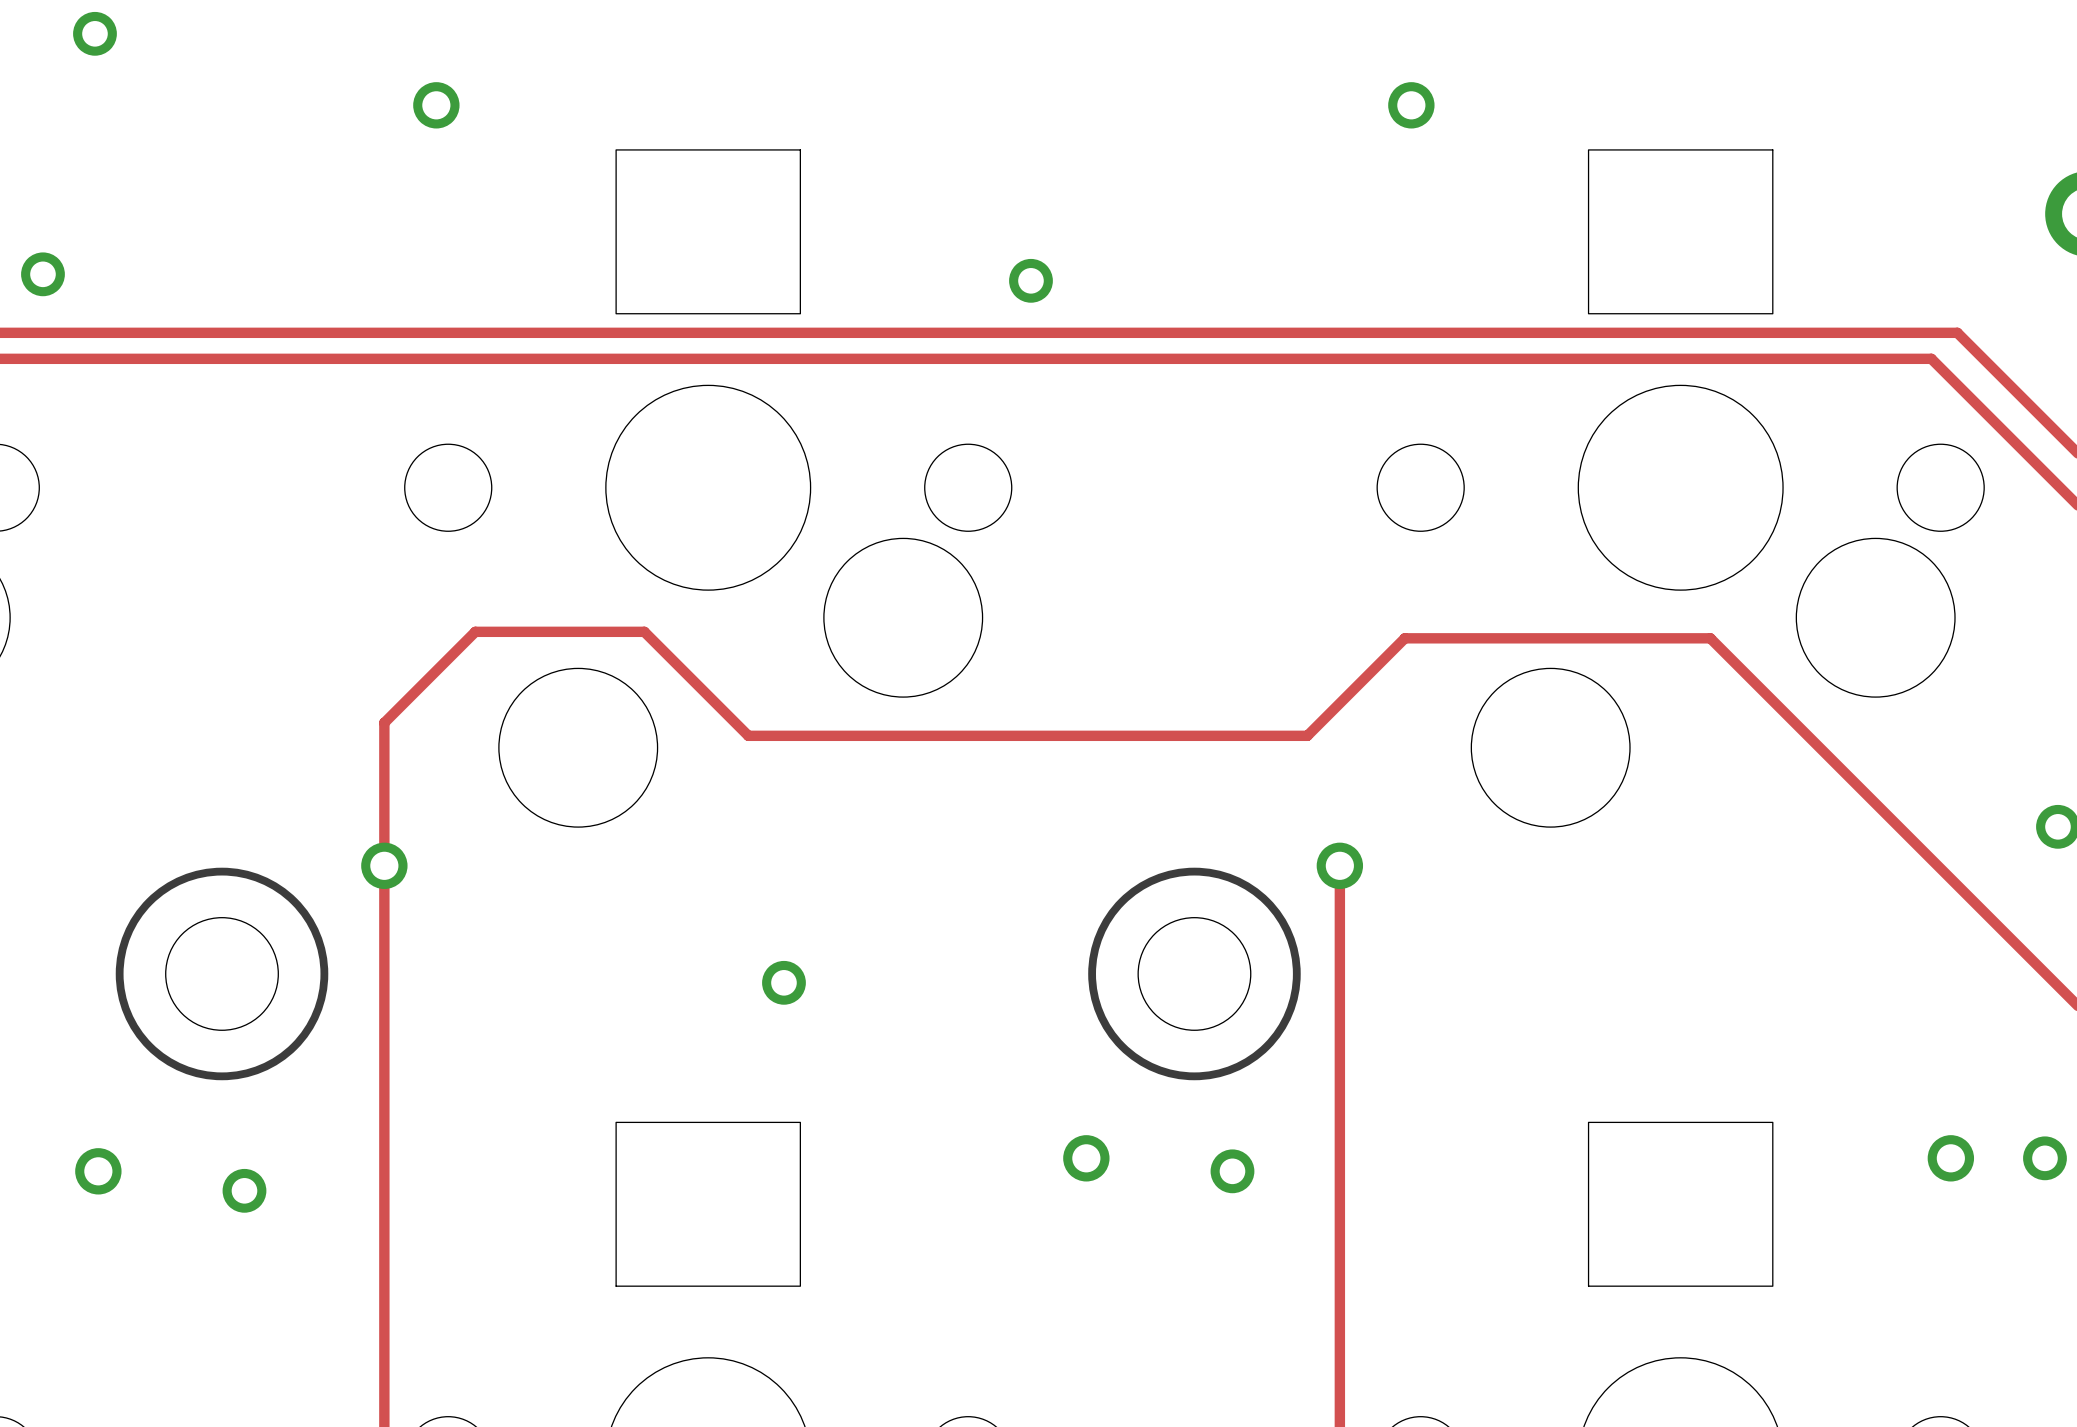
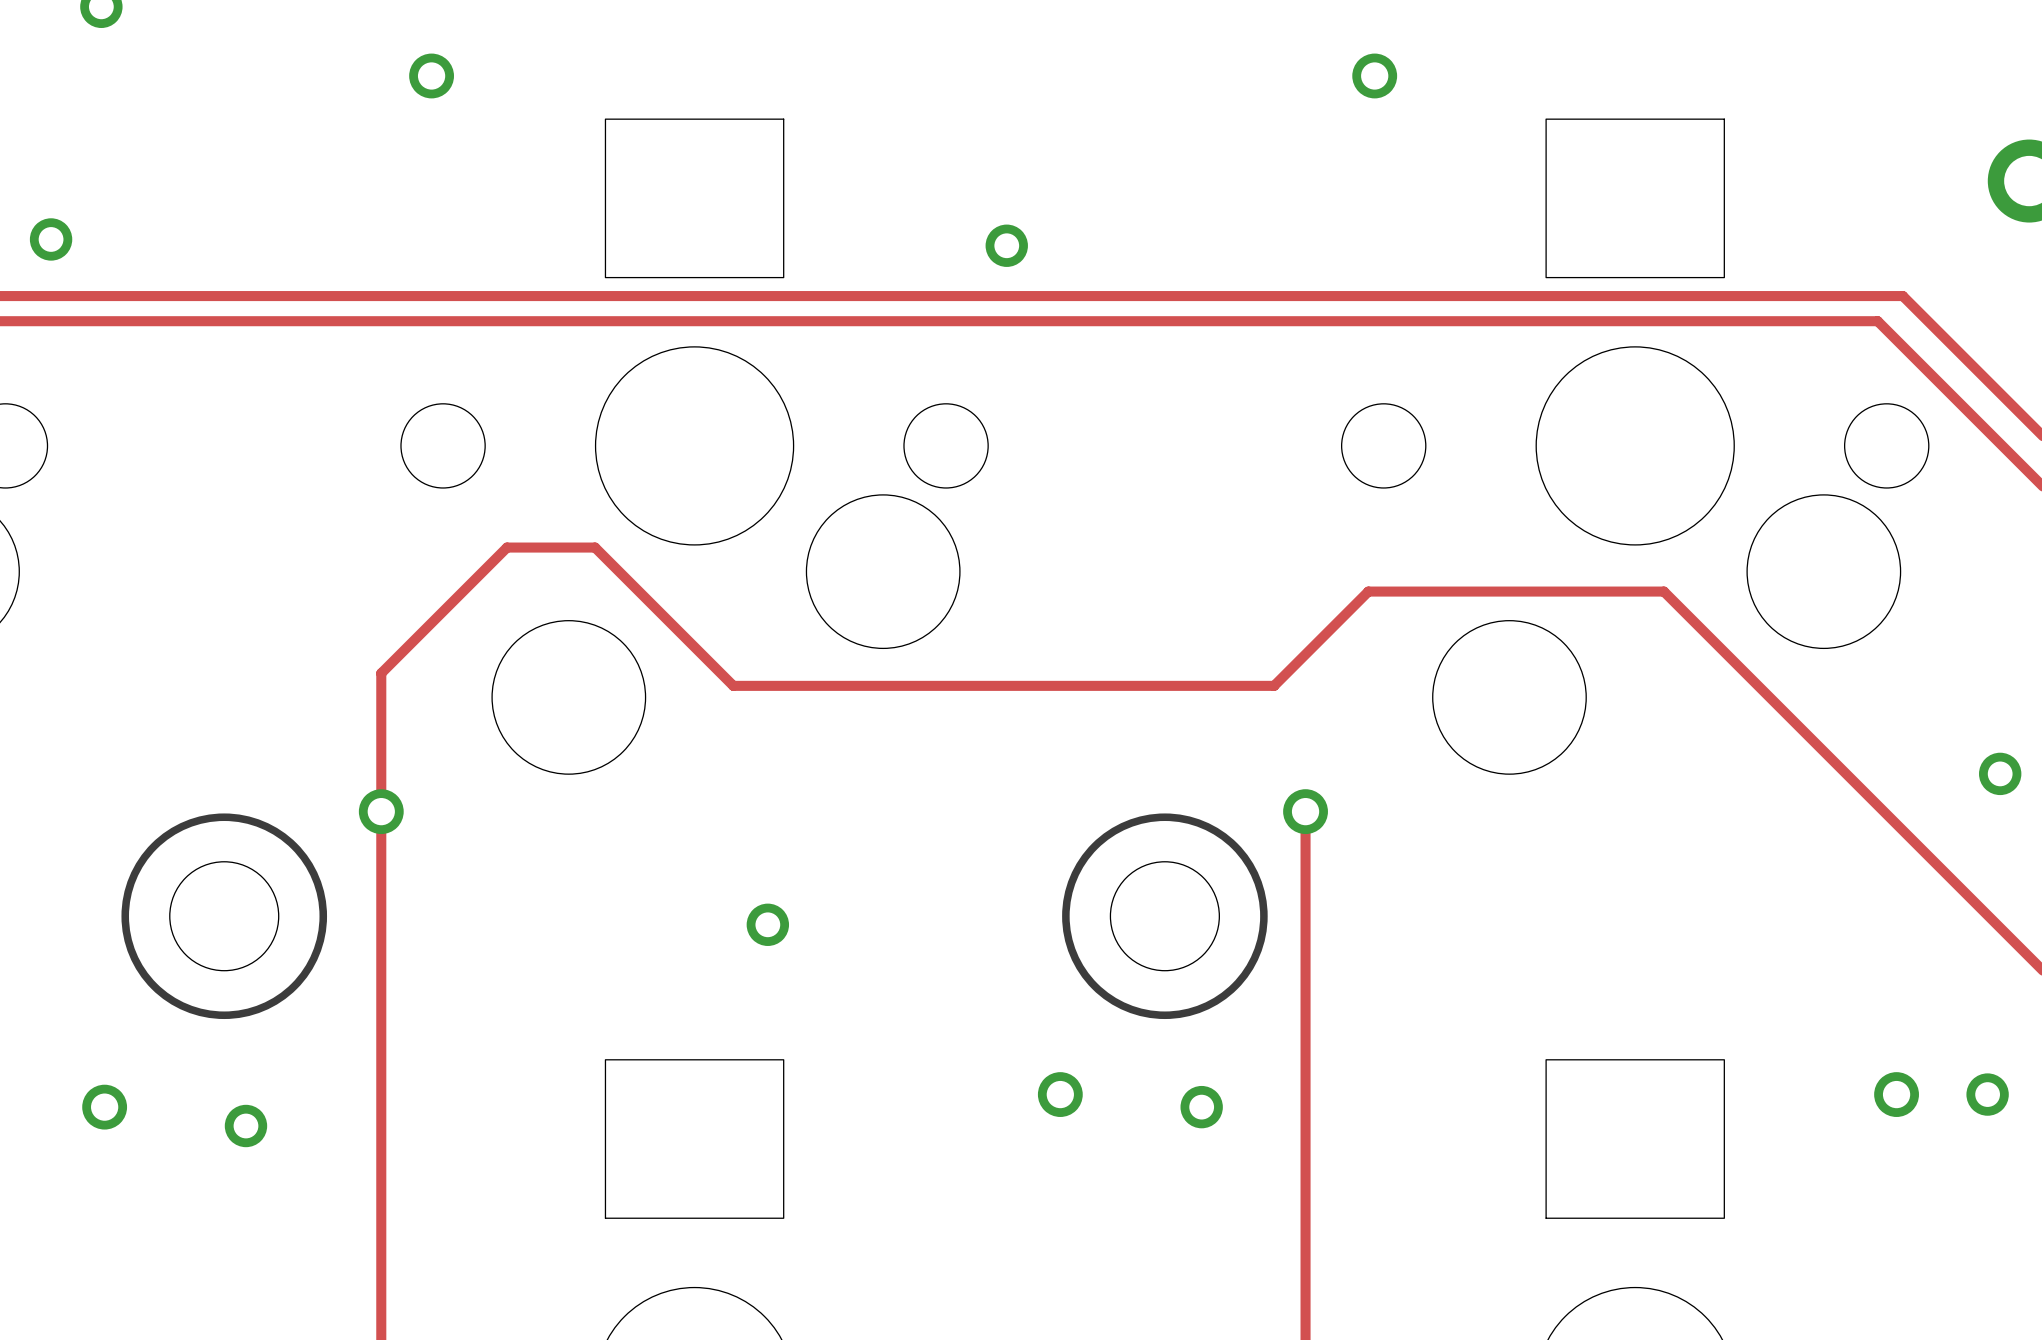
track: (475, 631) (644, 631) -> (469, 585) (507, 547) (595, 547) (632, 585)

